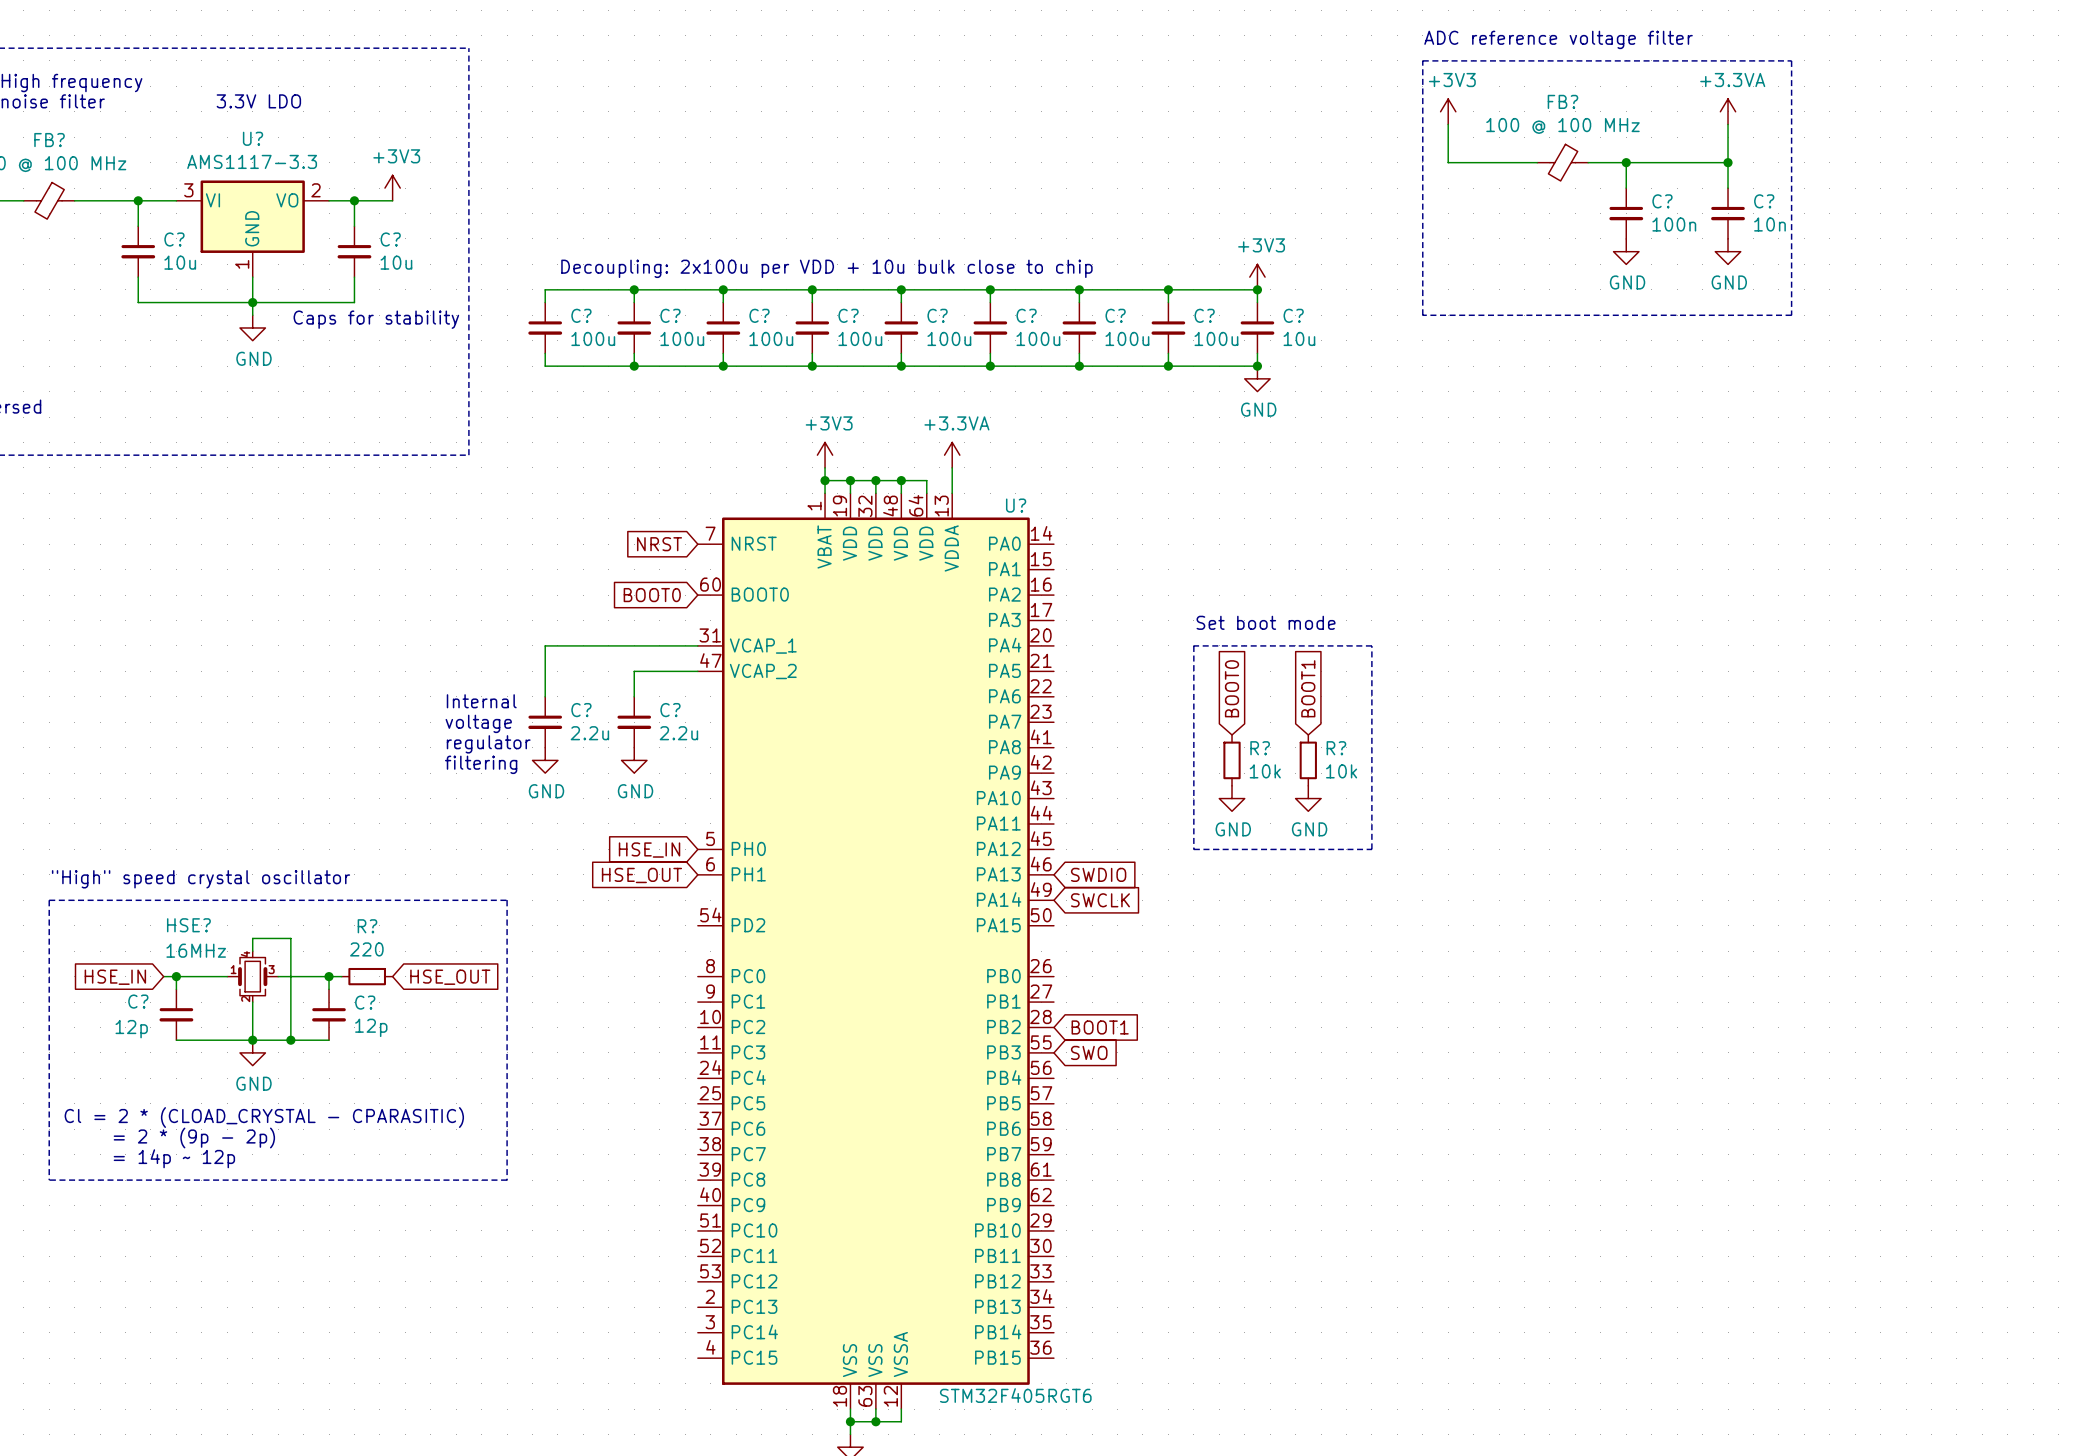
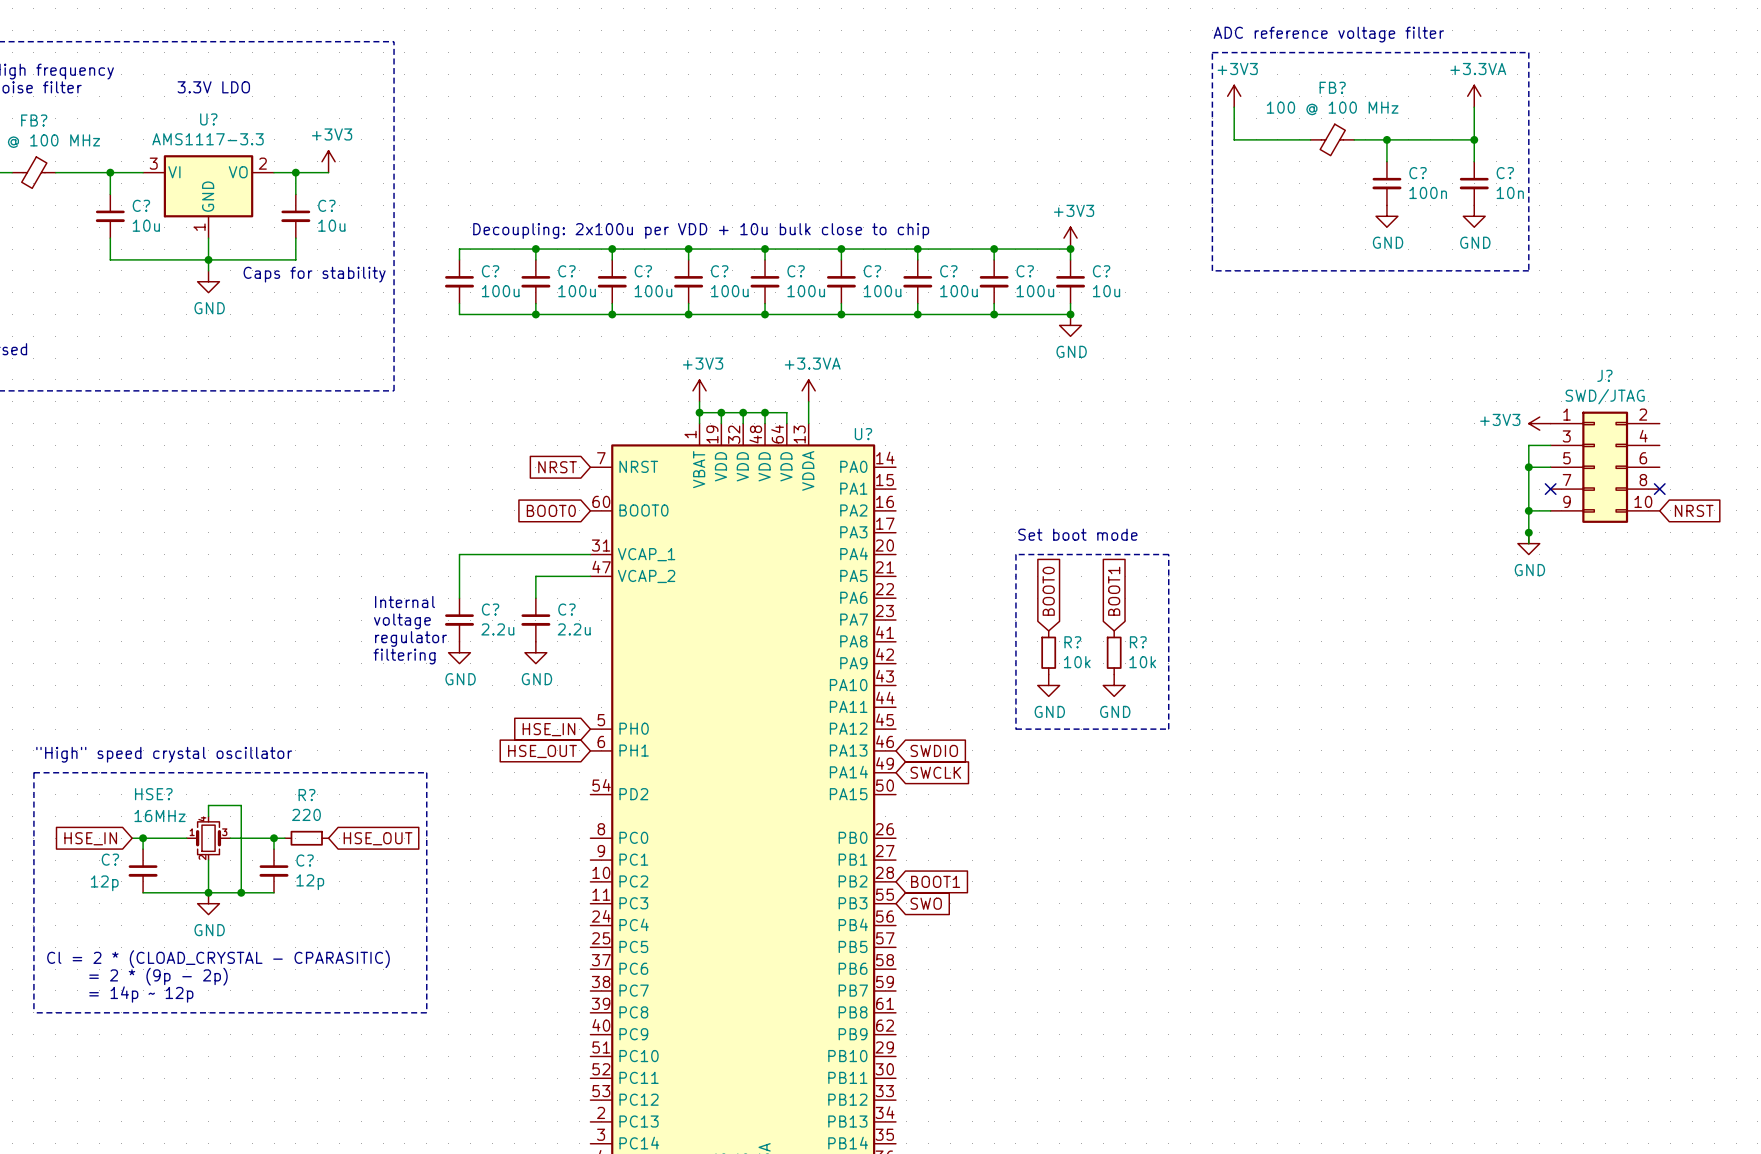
power symbol: none -> +3V3 (1539, 423)
wire: none -> (1550, 445) (1528, 445) (1528, 543)
wire: none -> (1528, 467) (1550, 467)
junction: none -> (1528, 467)
J?: none -> SWD/JTAG (1605, 467)
no-connect mark: none -> (1550, 489)
no-connect mark: none -> (1659, 489)
wire: none -> (1528, 510) (1550, 510)
junction: none -> (1528, 510)
global label: none -> NRST (1694, 510)
junction: none -> (1528, 532)
power symbol: none -> GND (1528, 543)

